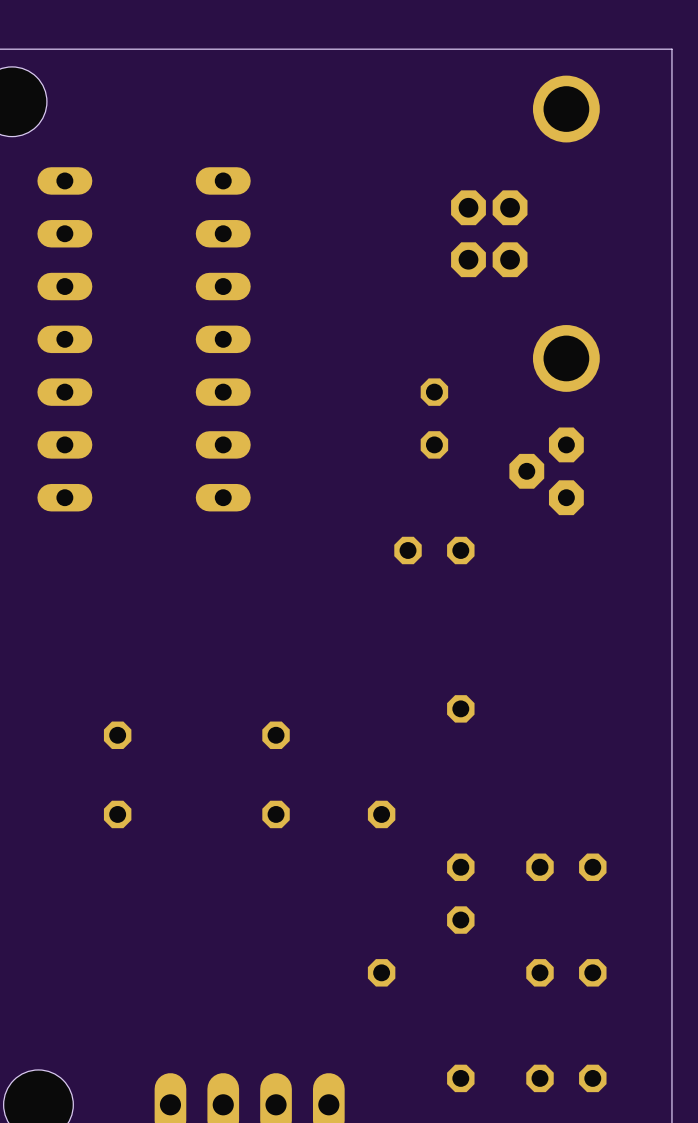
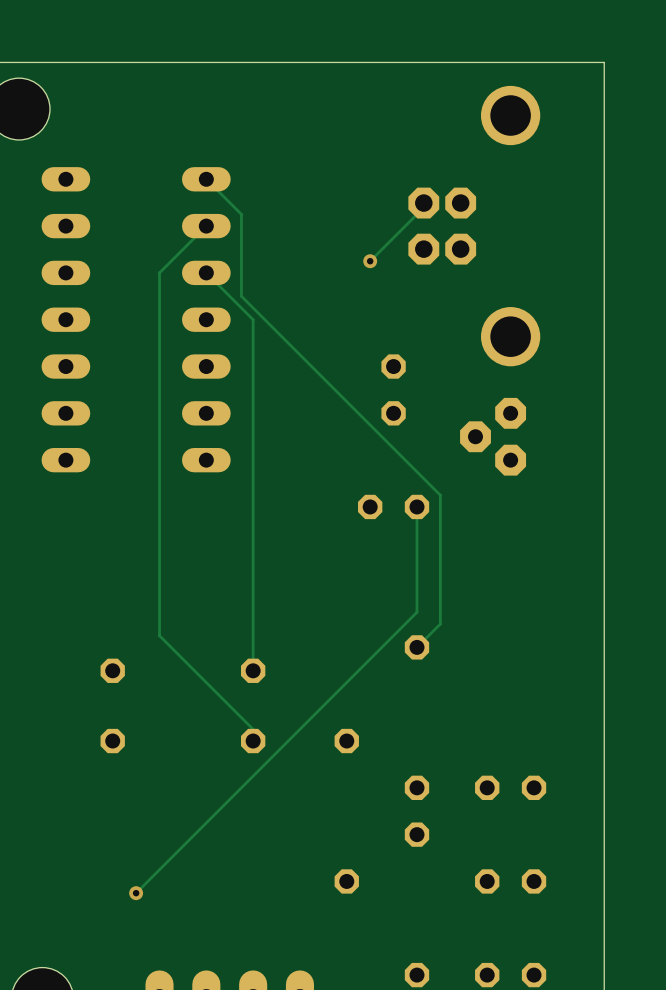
track: none -> (206, 179) (241, 214) (241, 296) (440, 495) (440, 623) (416, 647)
track: none -> (423, 203) (416, 214) (370, 261)
track: none -> (206, 226) (159, 272) (159, 635) (253, 729) (253, 741)
via: none -> (370, 261)
track: none -> (206, 272) (253, 319) (253, 670)
track: none -> (416, 506) (416, 612) (136, 893)
via: none -> (136, 893)

